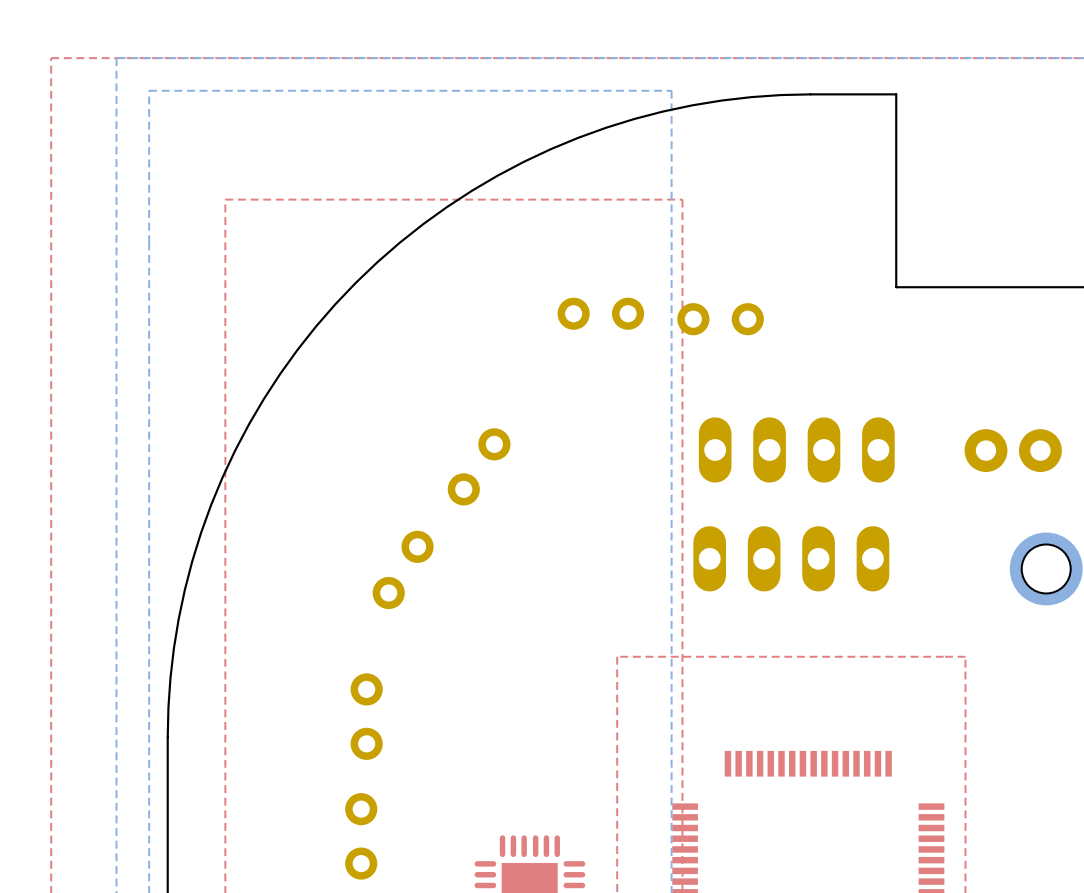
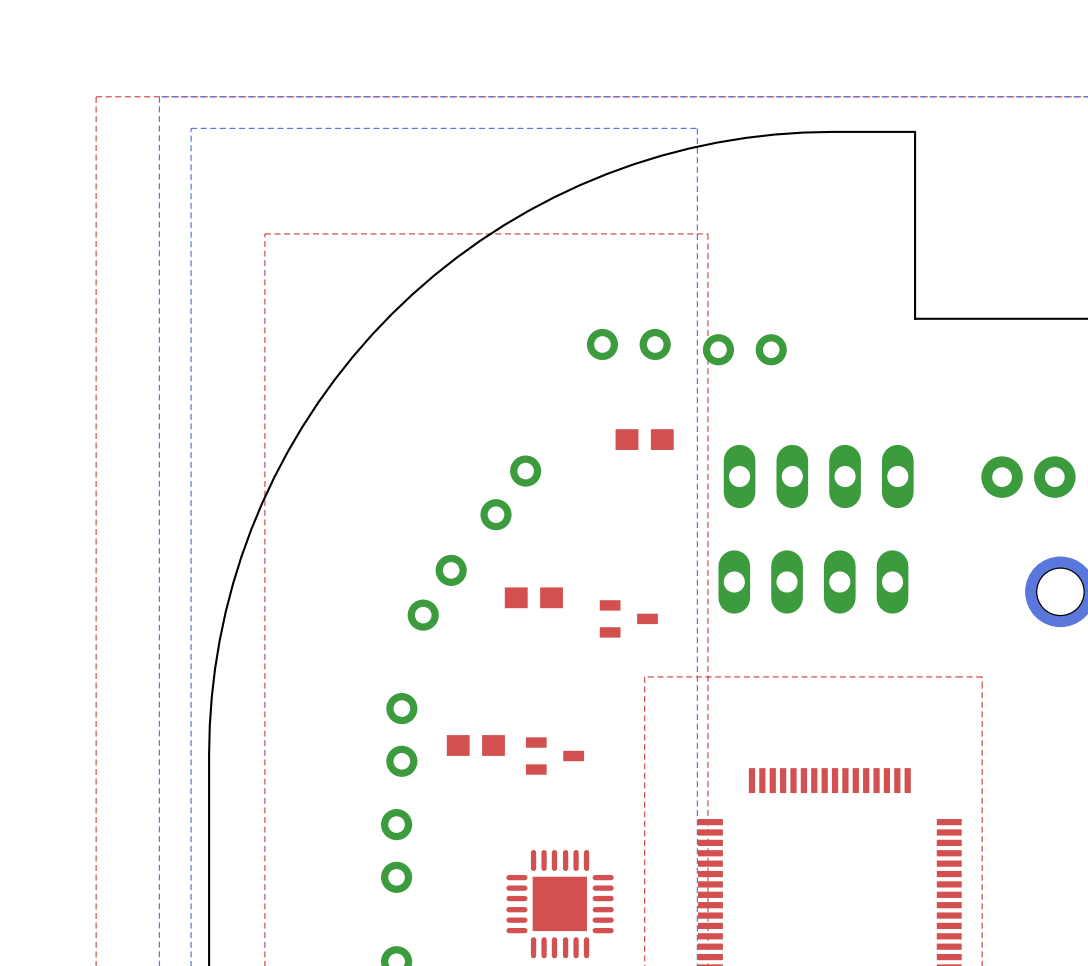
part: none -> (644, 439)
part: none -> (533, 597)
part: none -> (628, 618)
part: none -> (475, 745)
part: none -> (554, 756)

